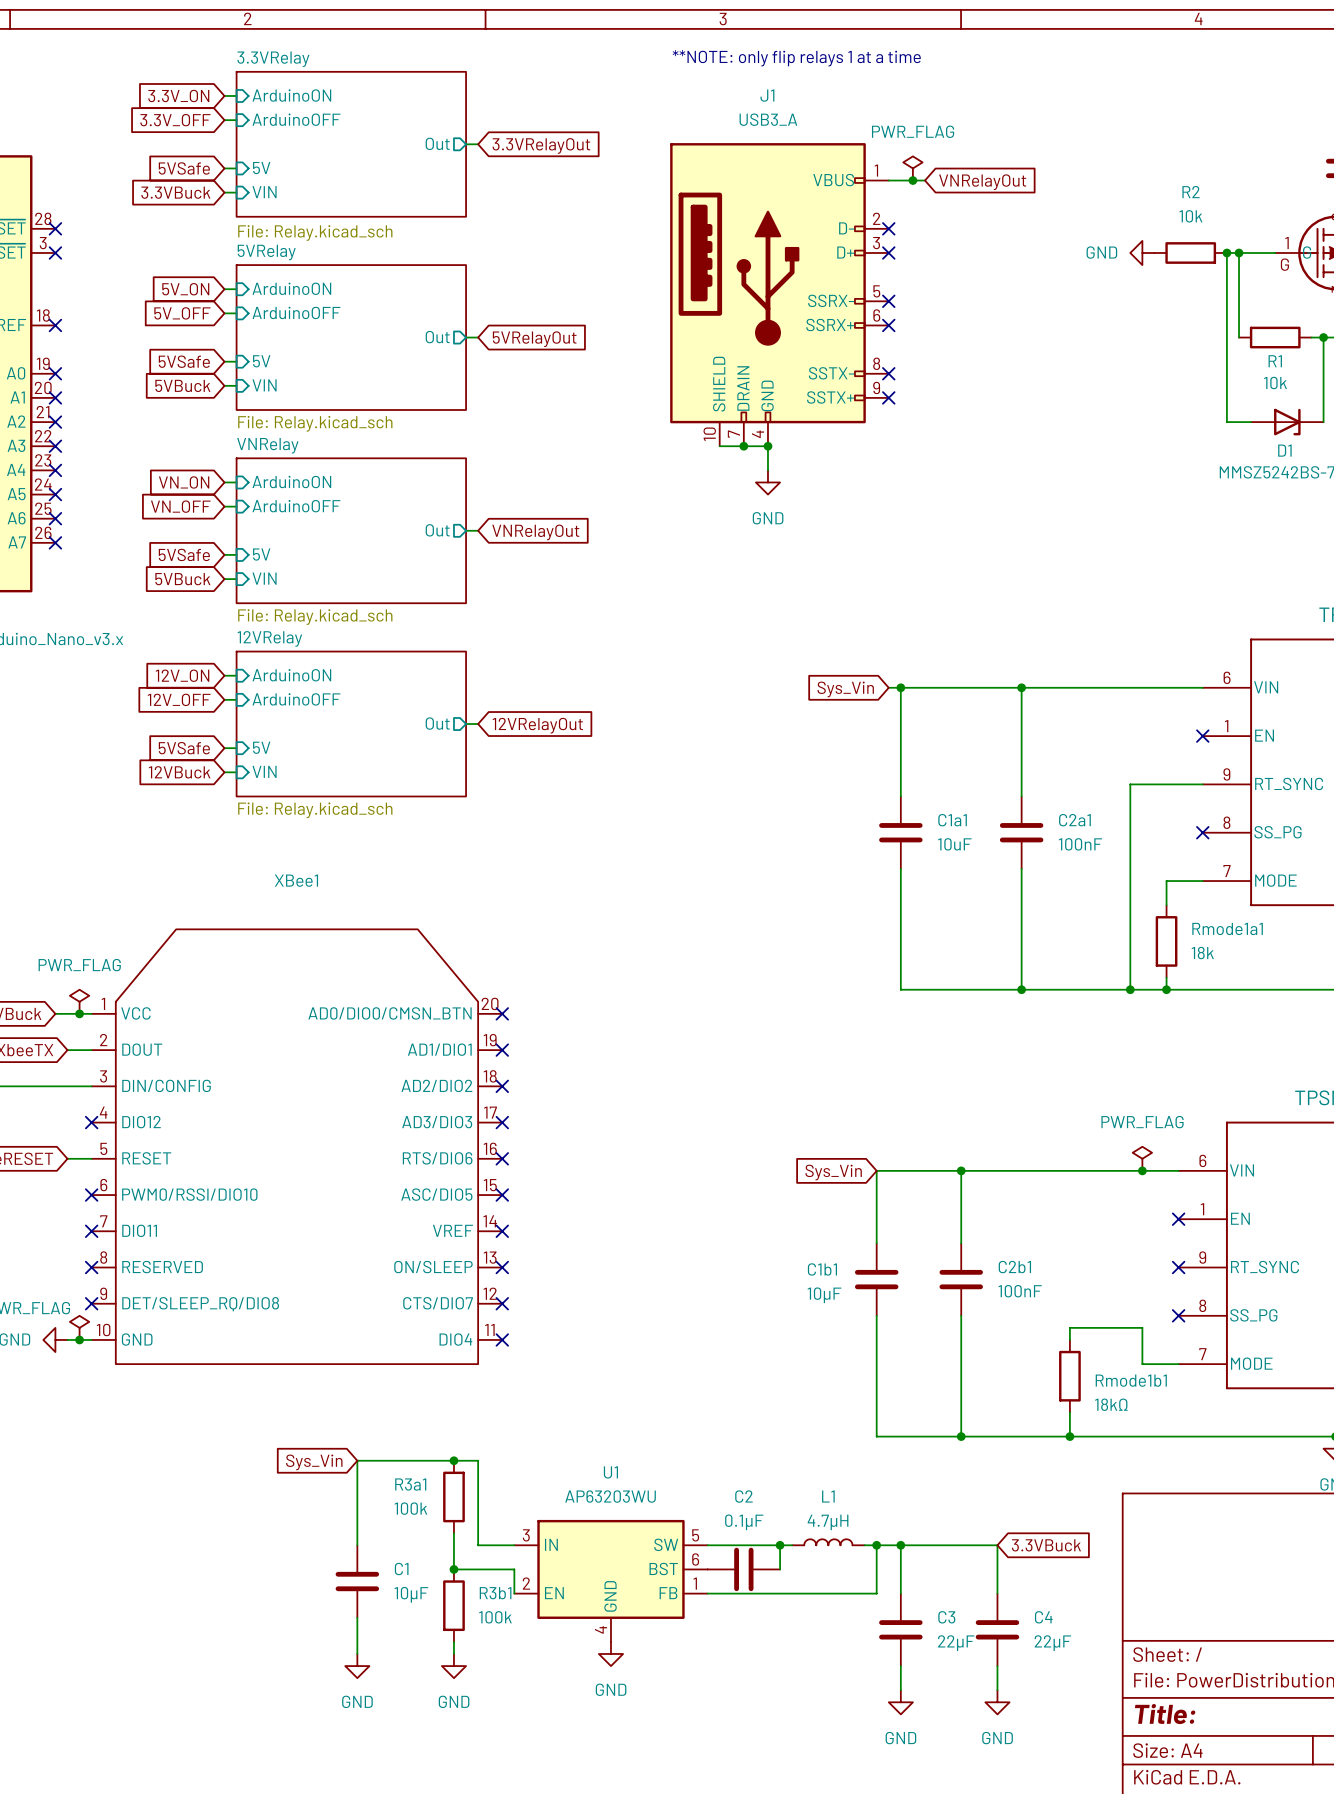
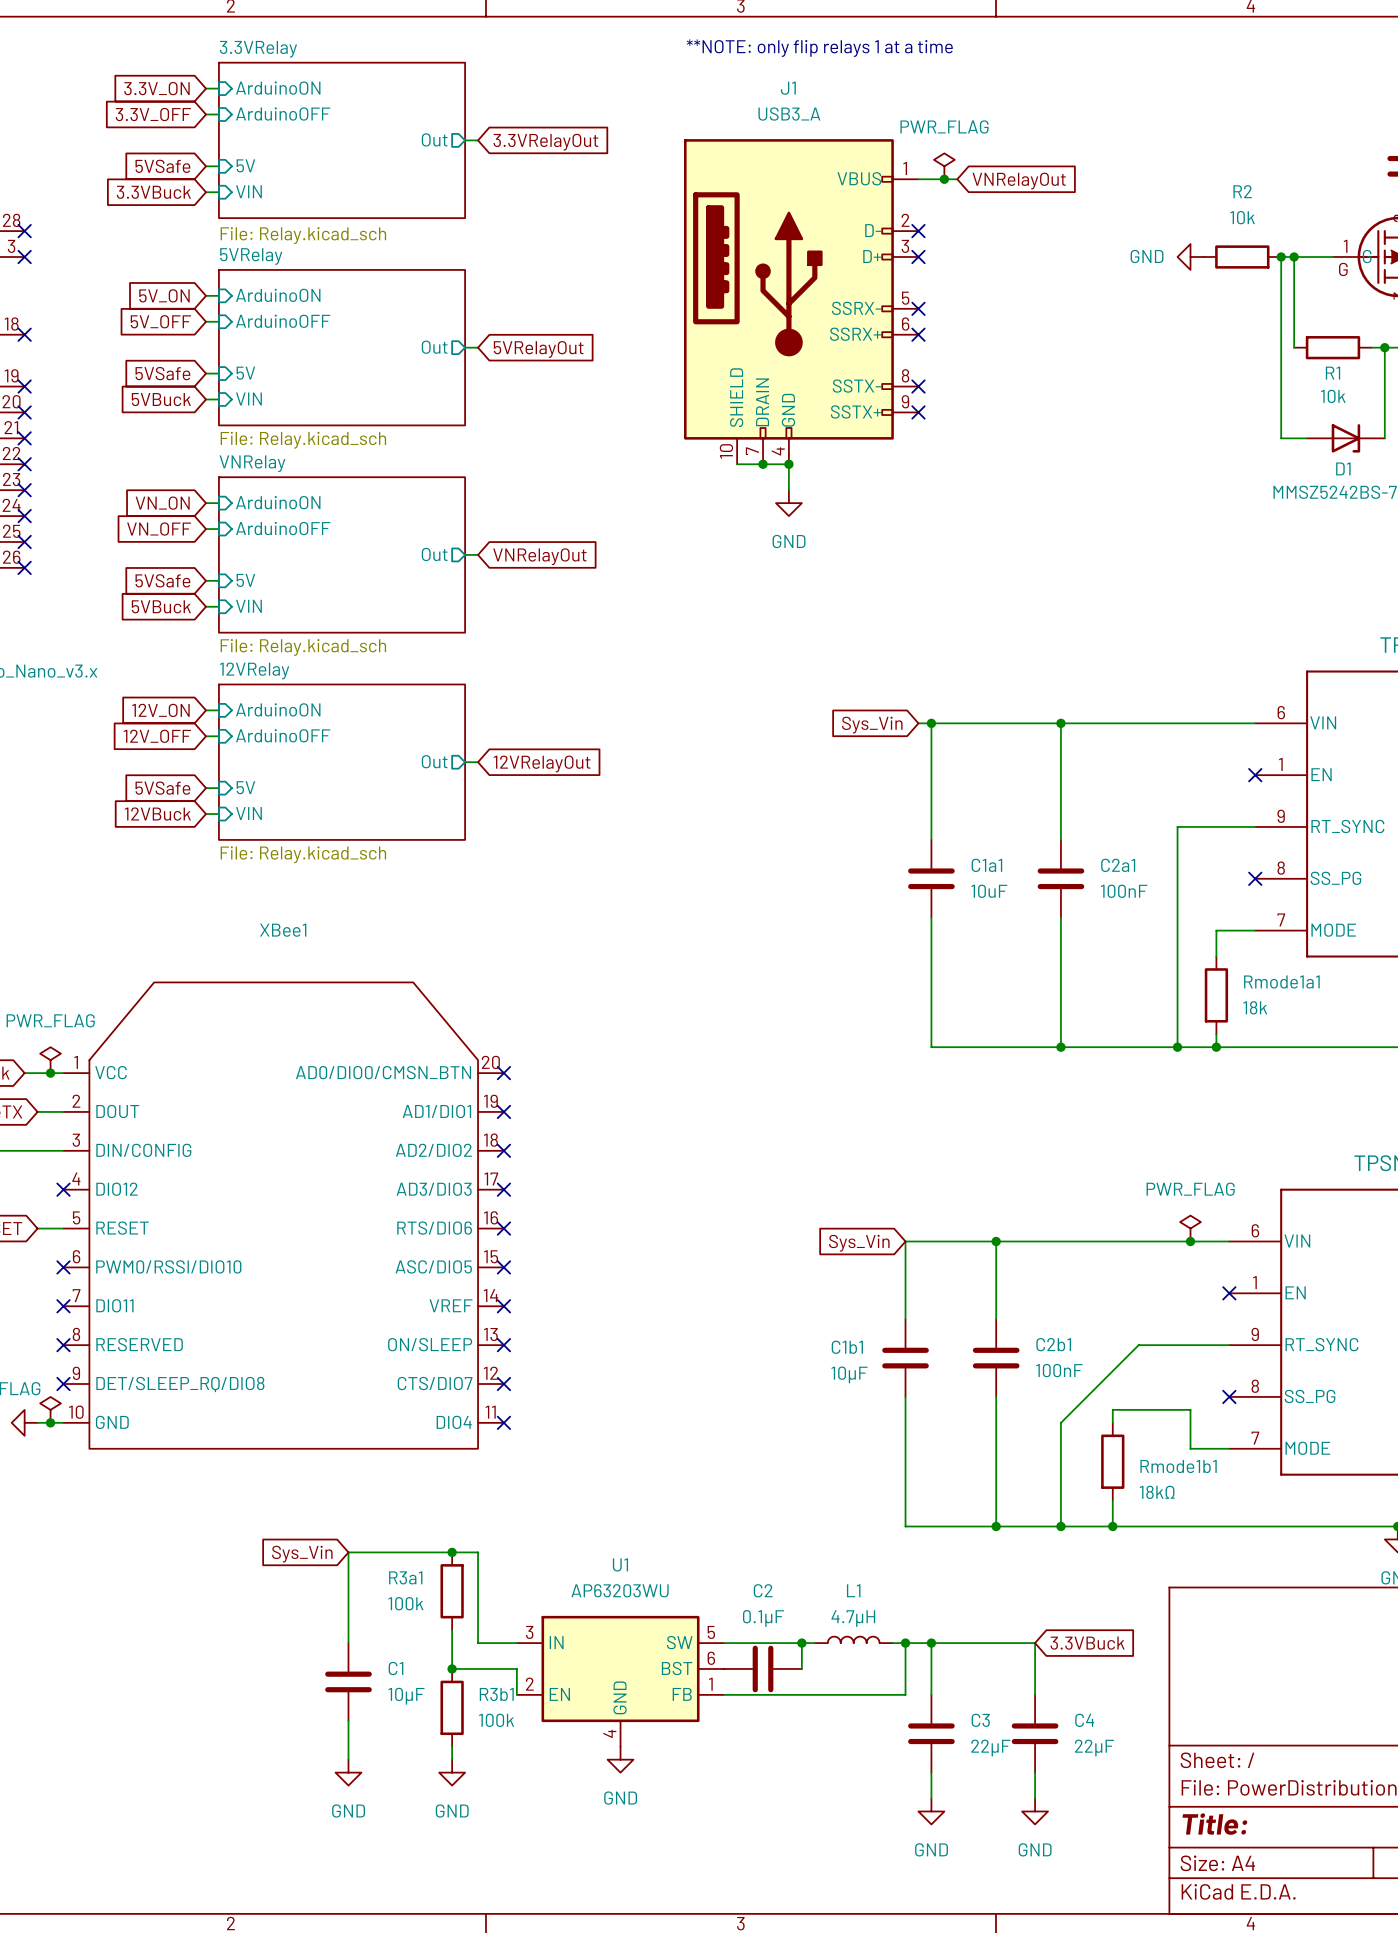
wire: none -> (1229, 1345) (1138, 1345) (1060, 1422) (1060, 1526)
no-connect mark: (1178, 1267) -> none
junction: none -> (1060, 1526)

